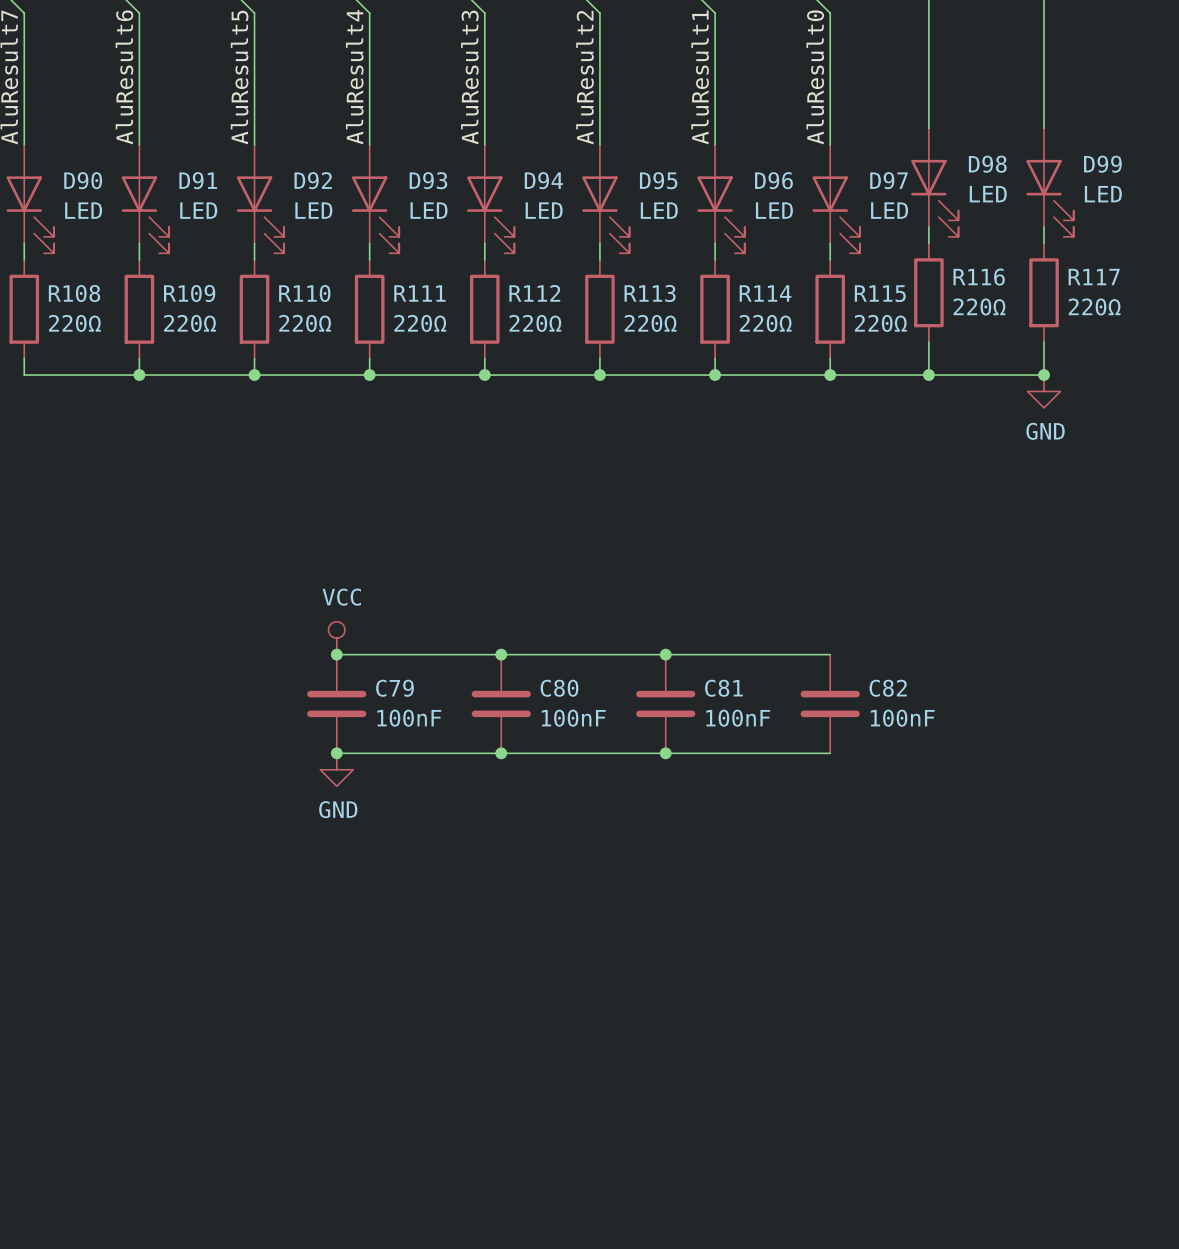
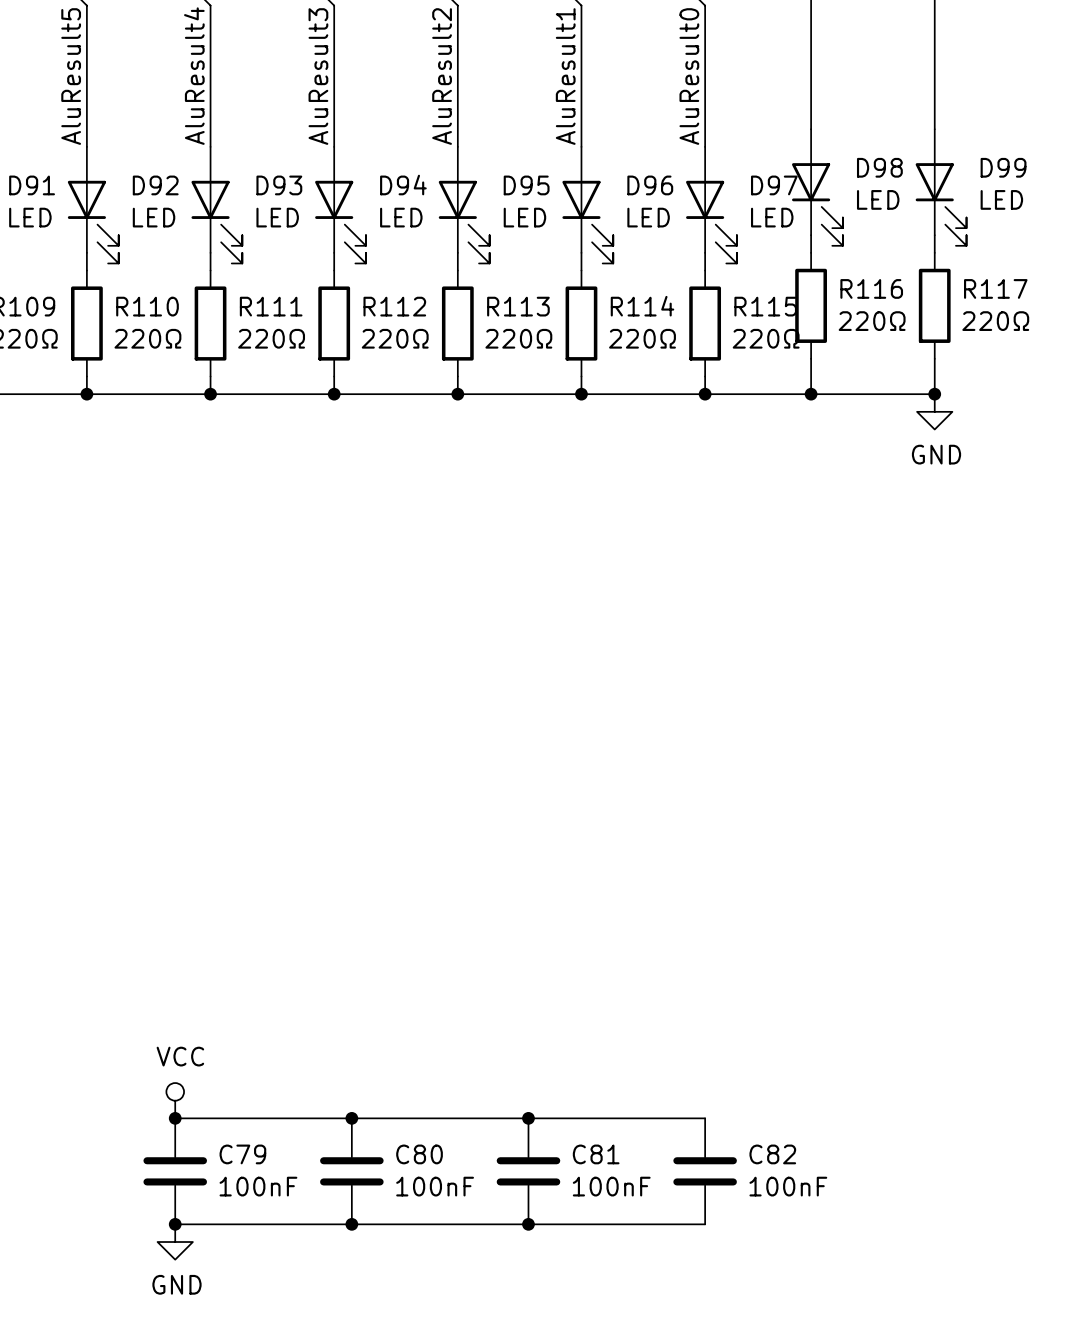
power symbol: VCC (336, 638) -> none
wire: (336, 654) (830, 654) -> none
junction: (336, 654) -> none
junction: (501, 654) -> none
junction: (665, 654) -> none
C79 position: (336, 703) -> (175, 1171)
C80 position: (501, 703) -> (351, 1171)
C81 position: (665, 703) -> (528, 1171)
C82 position: (830, 703) -> (705, 1171)
wire: (336, 753) (830, 753) -> (175, 1118) (705, 1118)
junction: (336, 753) -> none
junction: (501, 753) -> none
junction: (665, 753) -> none
power symbol: GND (336, 769) -> none
power symbol: none -> VCC (175, 1100)
junction: none -> (175, 1118)
junction: none -> (351, 1118)
junction: none -> (528, 1118)
wire: none -> (175, 1224) (705, 1224)
junction: none -> (175, 1224)
junction: none -> (351, 1224)
junction: none -> (528, 1224)
power symbol: none -> GND (175, 1242)

